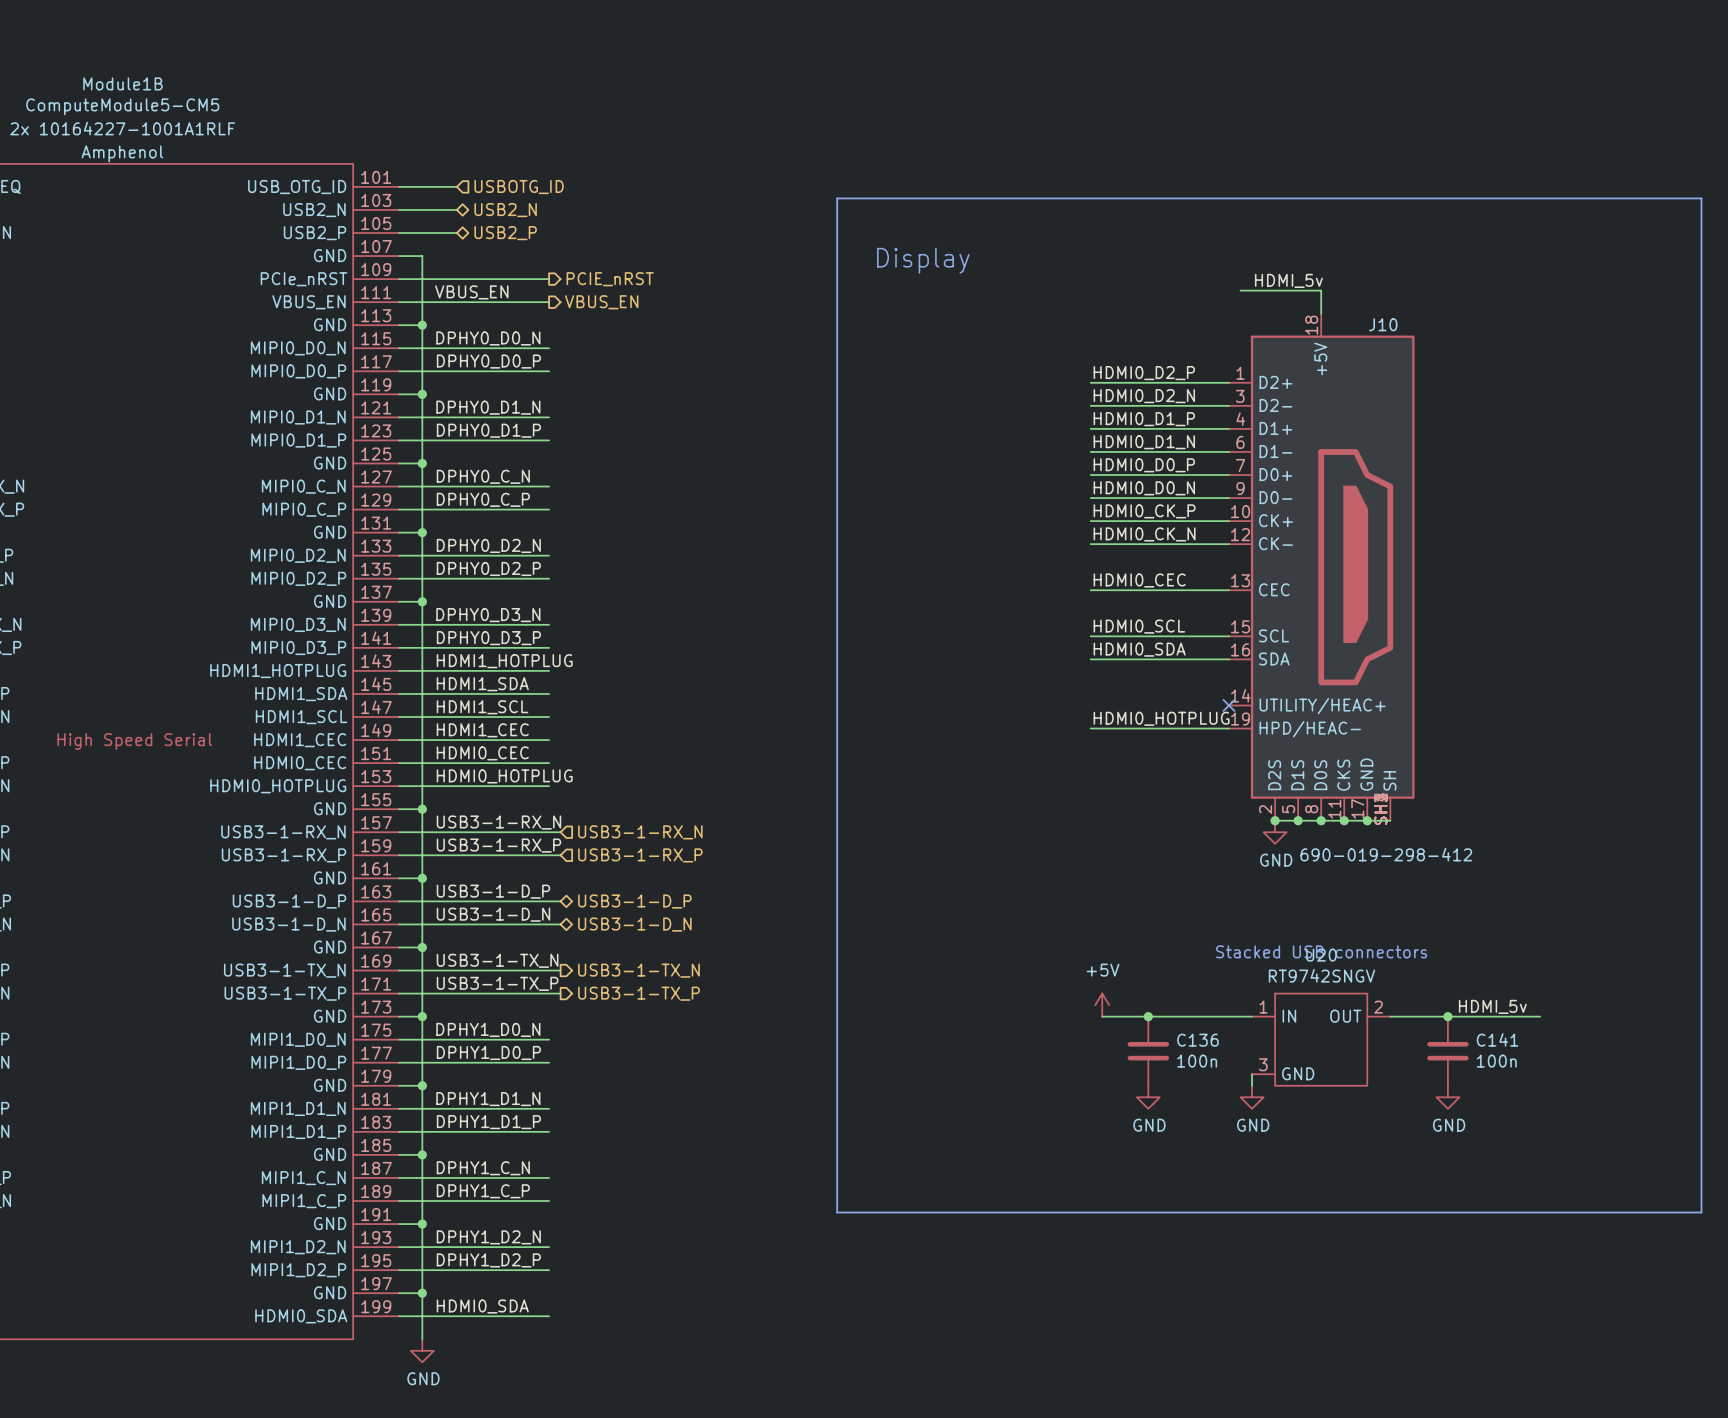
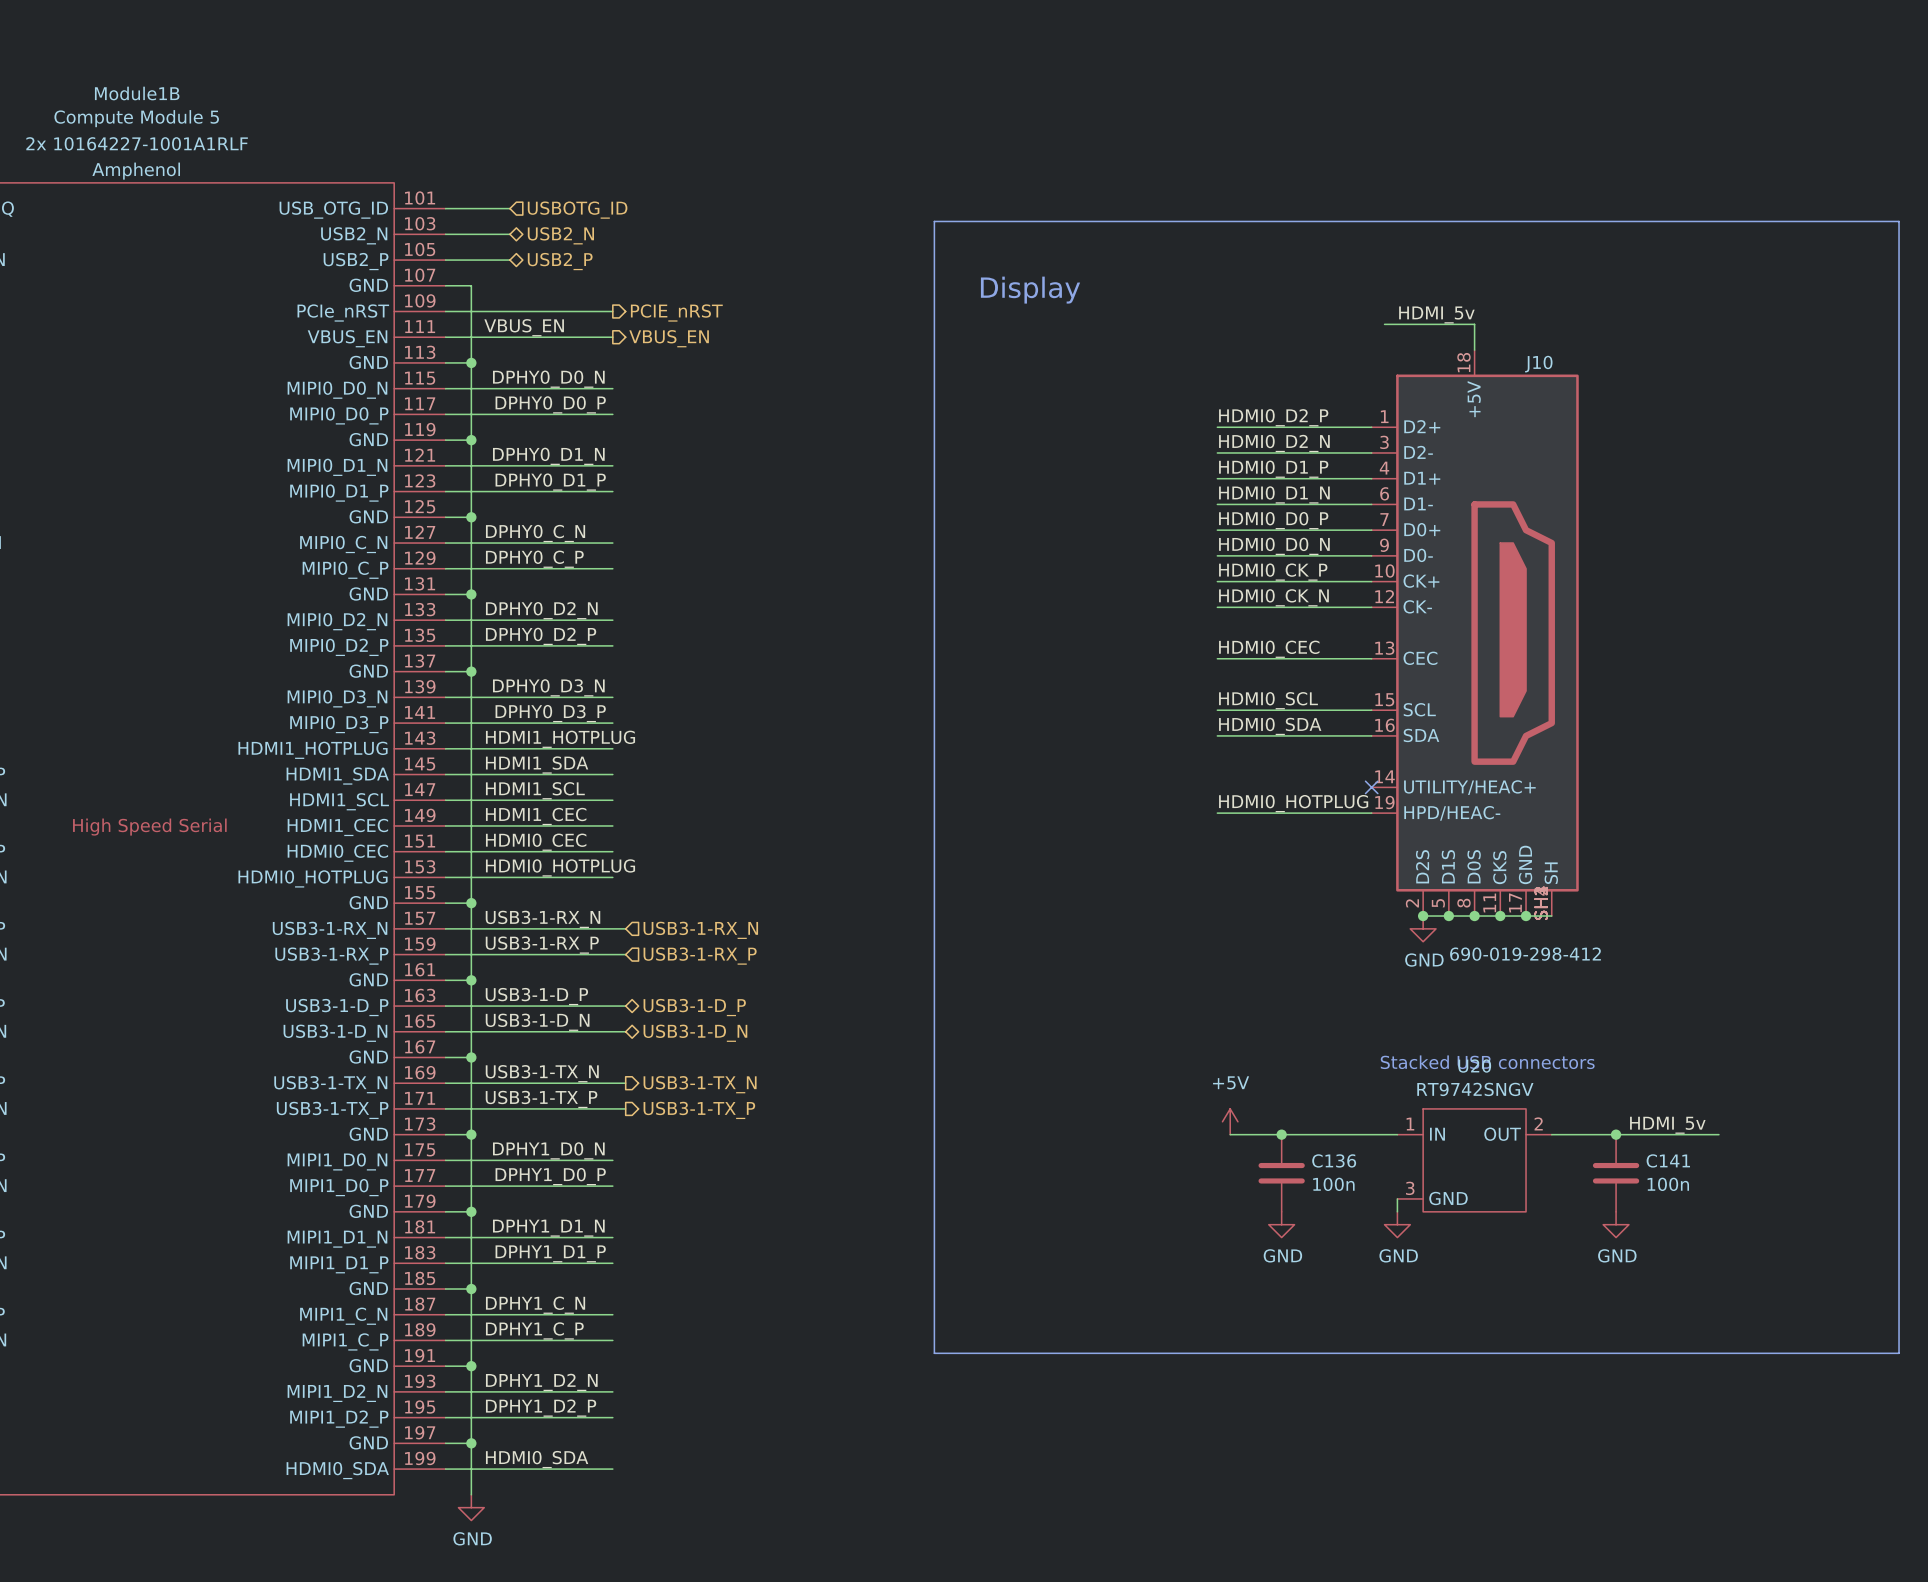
Module1B value: ComputeModule5-CM5 (122, 106) -> Compute Module 5 (136, 118)

